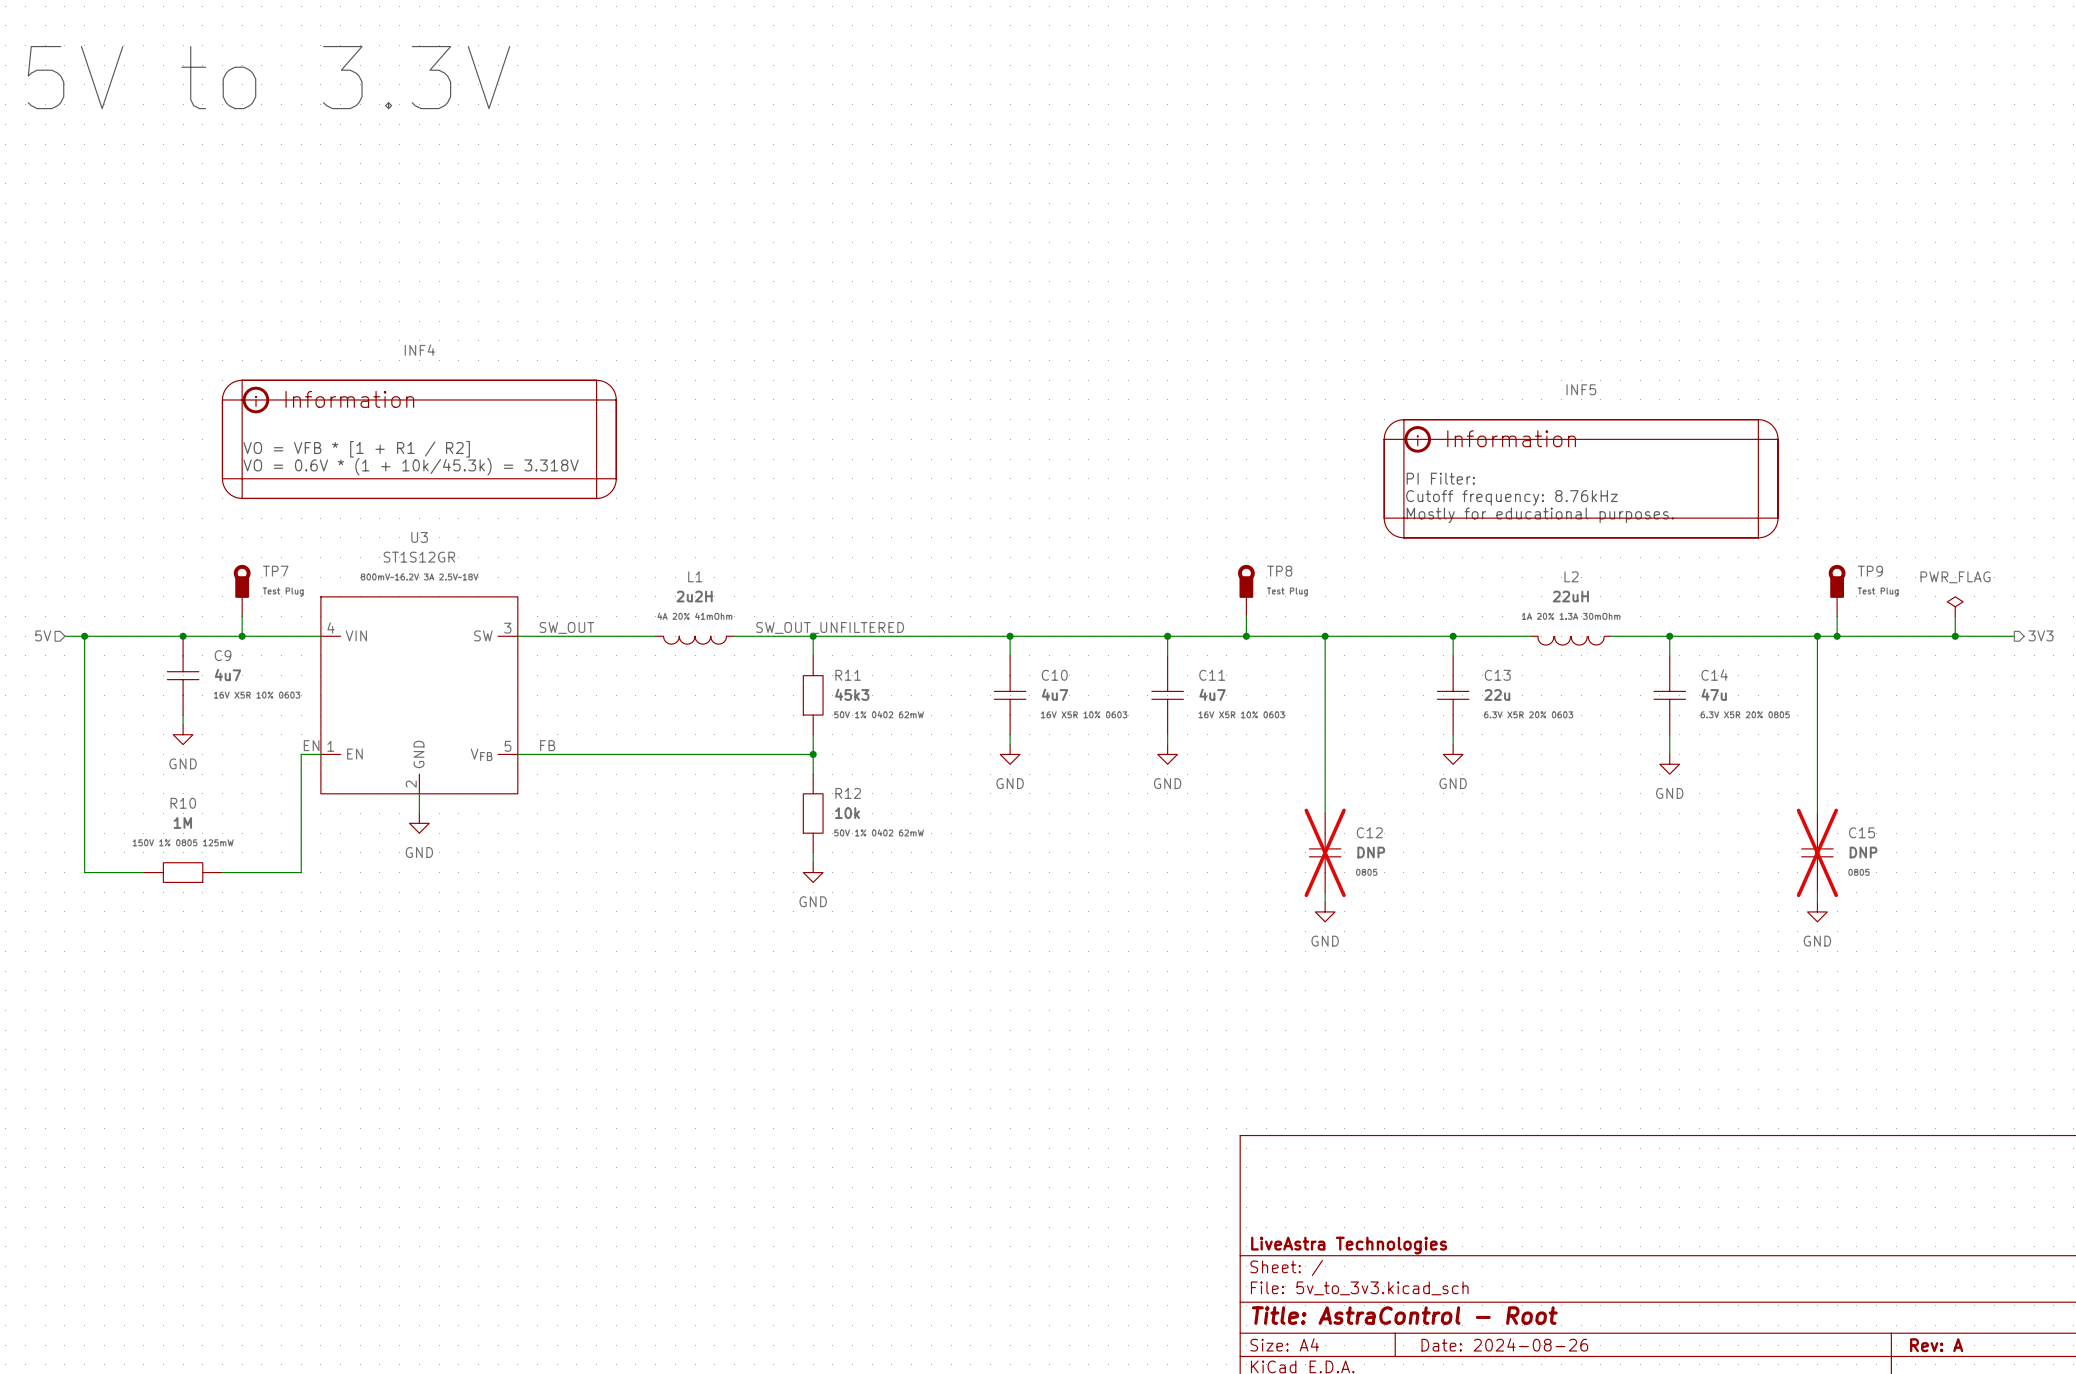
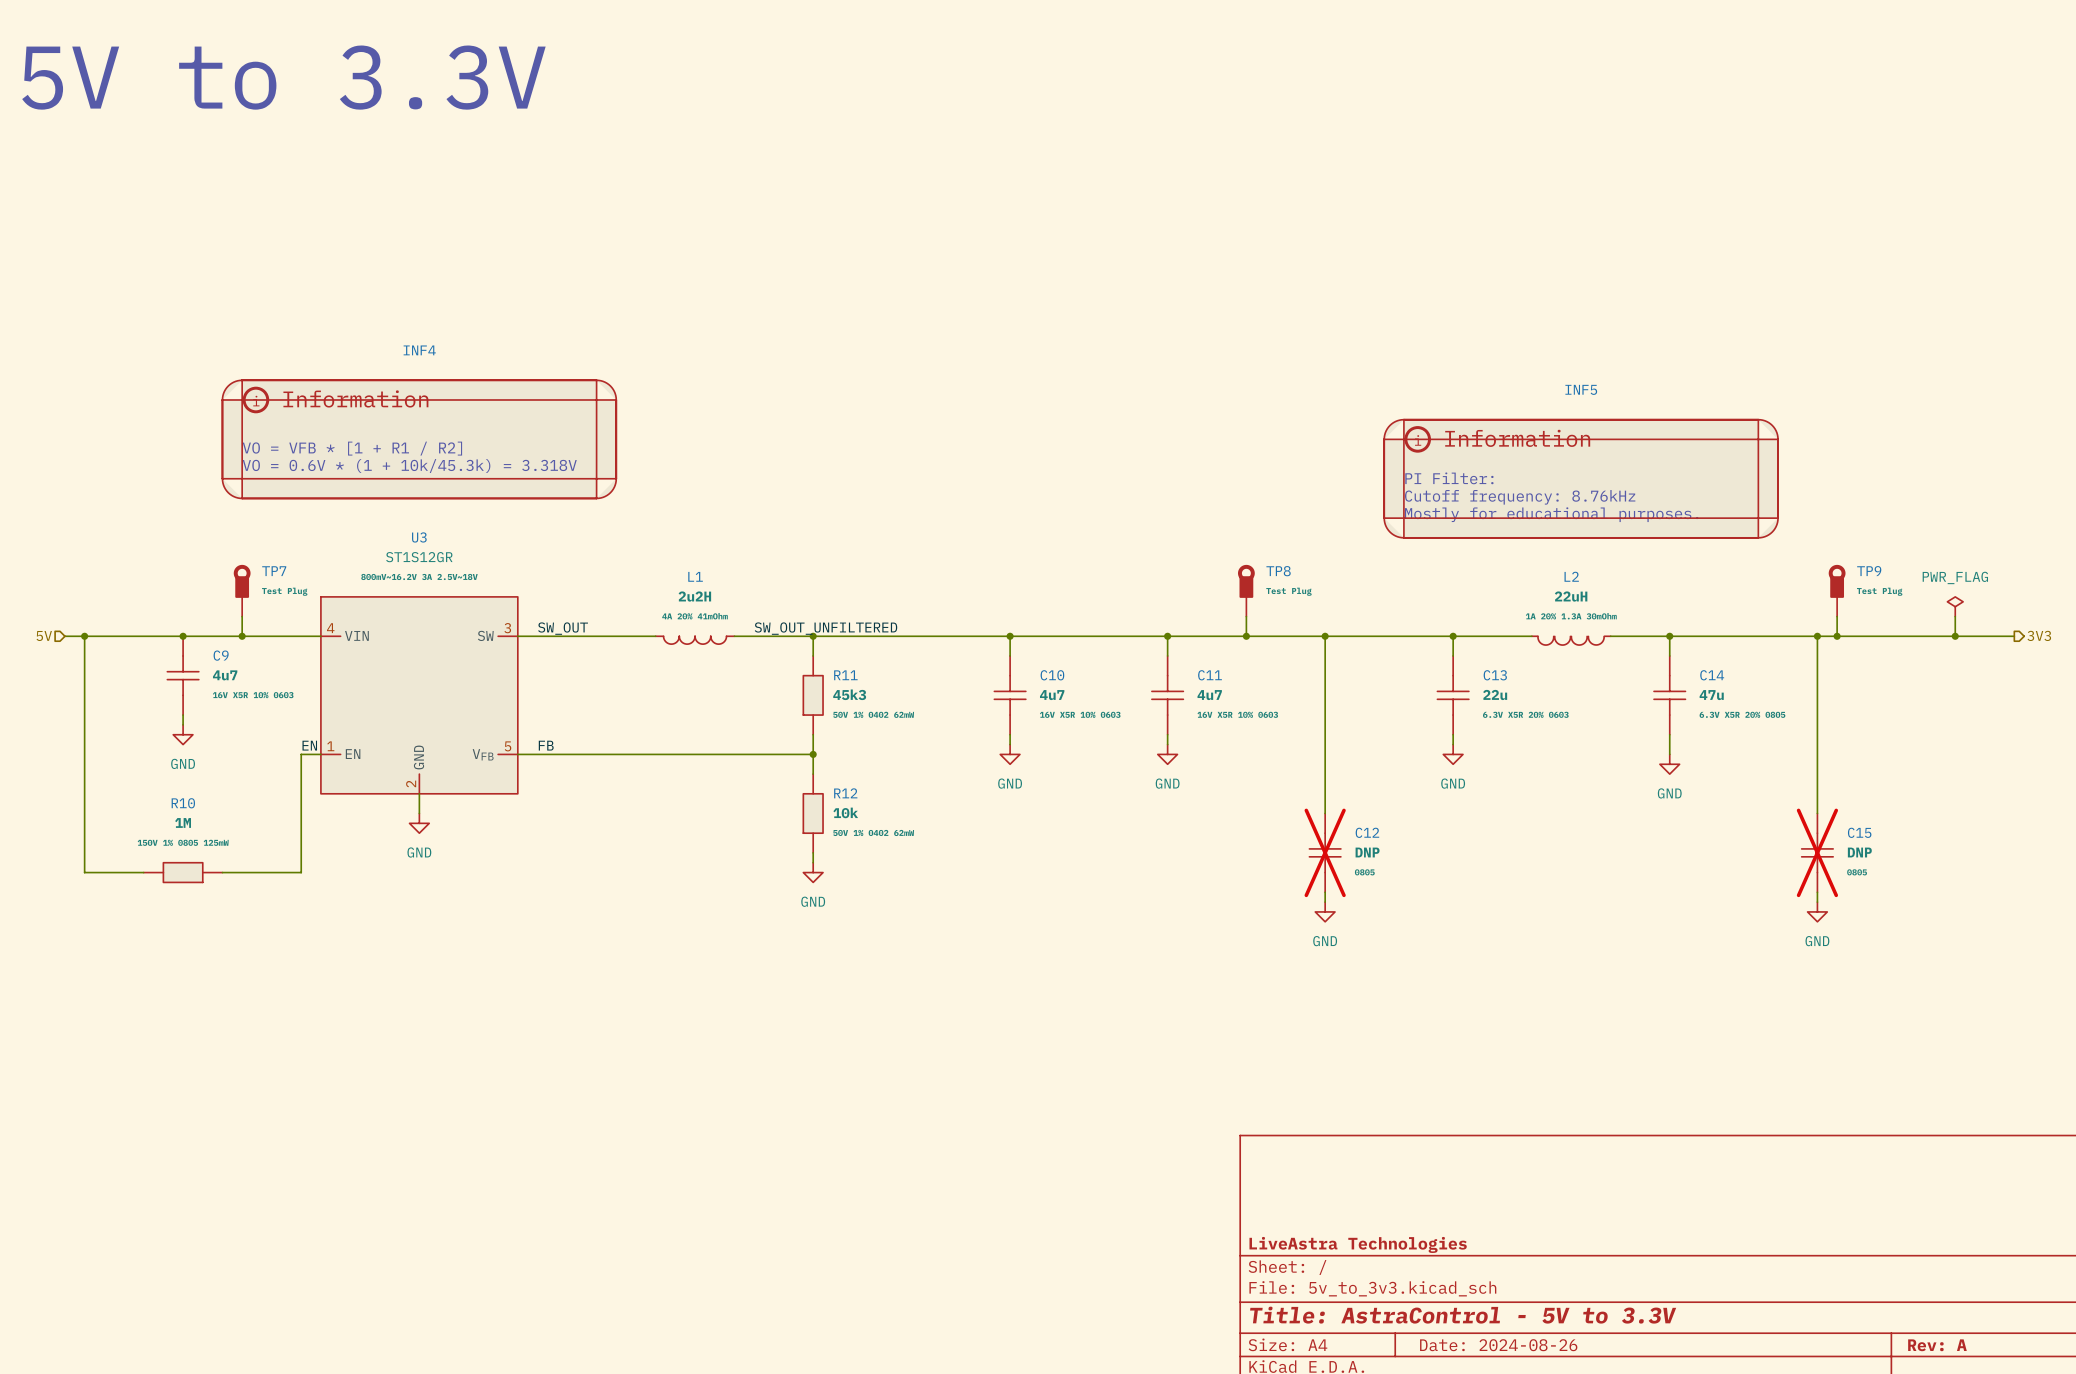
title block: Title: AstraControl - Root (1404, 1315) -> Title: AstraControl - 5V to 3.3V (1463, 1315)

